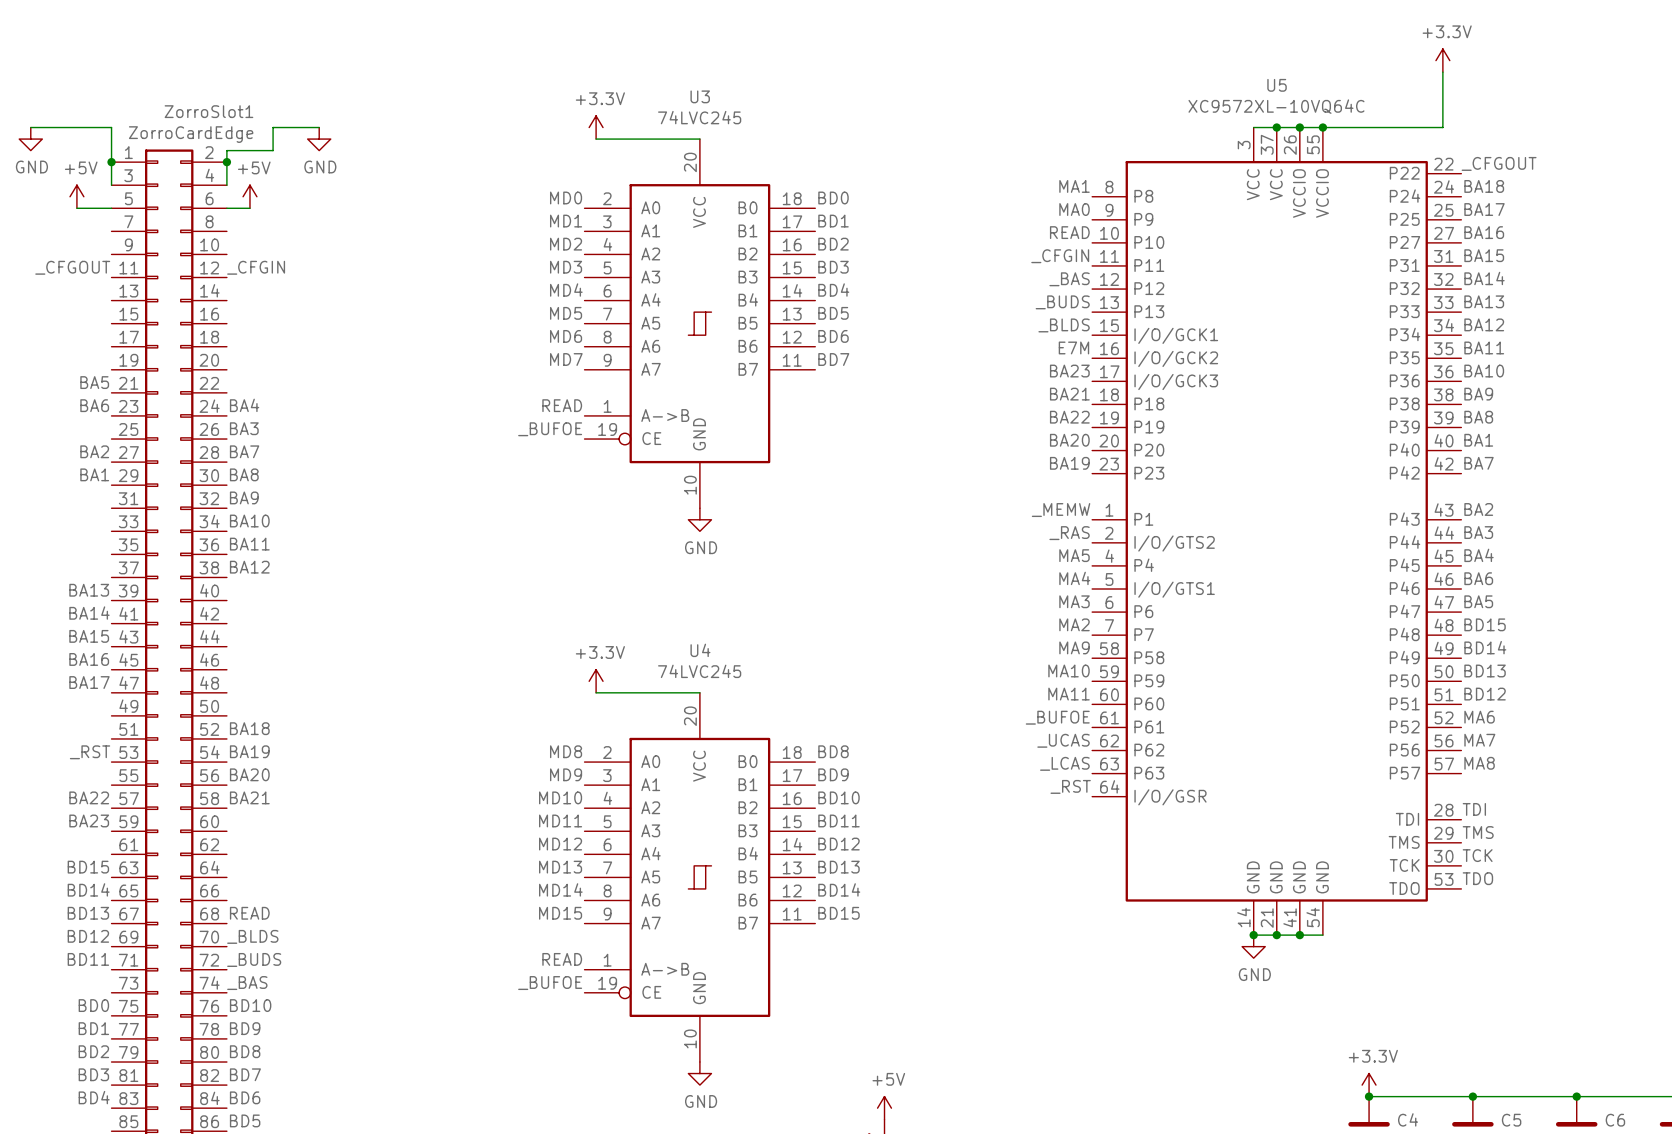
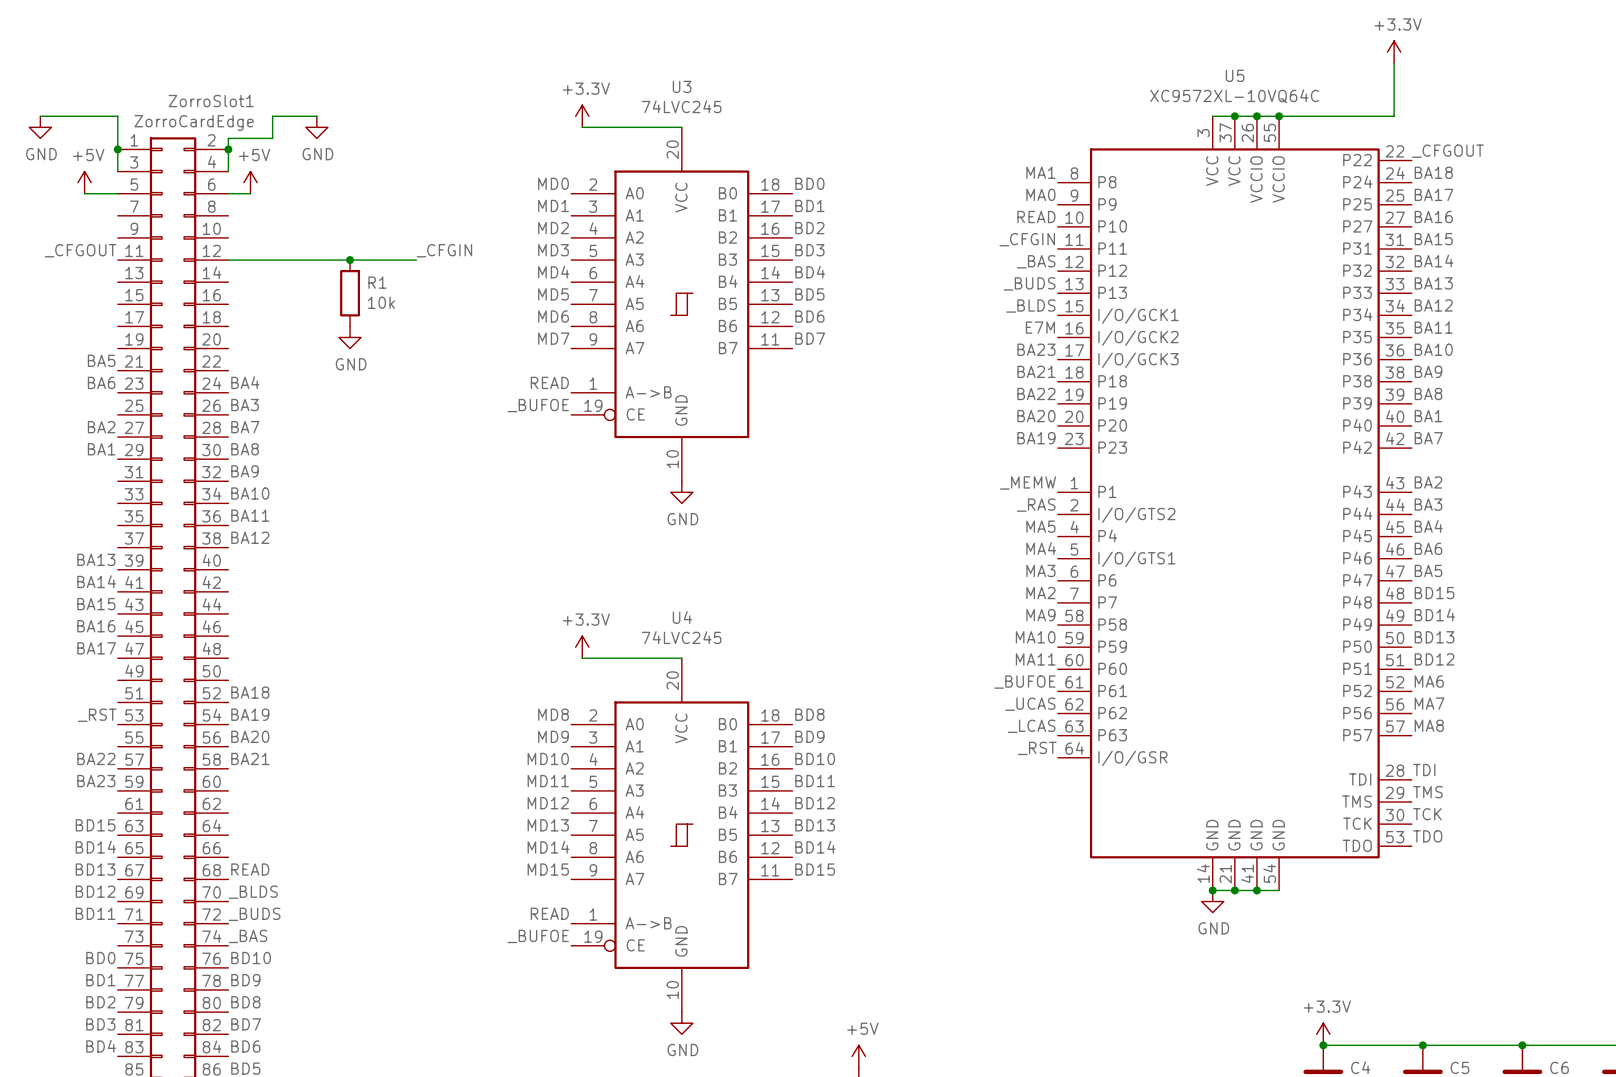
label position: _CFGIN (256, 267) -> _CFGIN (444, 250)
wire: none -> (228, 260) (416, 260)
junction: none -> (350, 260)
R1: none -> 10k (350, 293)
power symbol: none -> GND (350, 337)

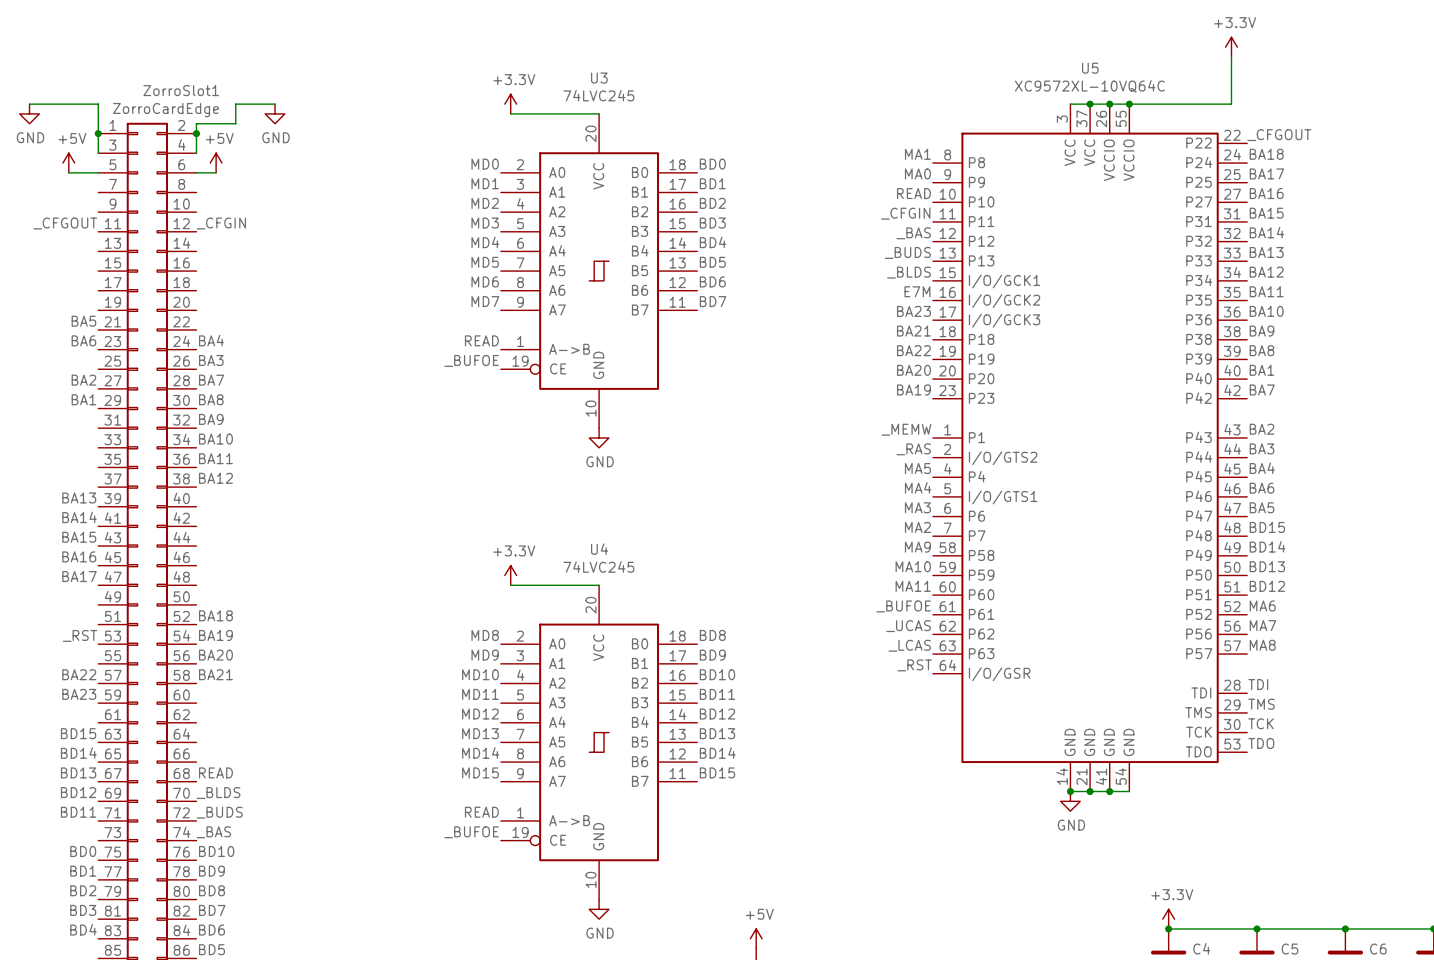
label position: _CFGIN (444, 250) -> _CFGIN (221, 223)
wire: (228, 260) (416, 260) -> none
junction: (350, 260) -> none
R1: 10k (350, 293) -> none
power symbol: GND (350, 337) -> none

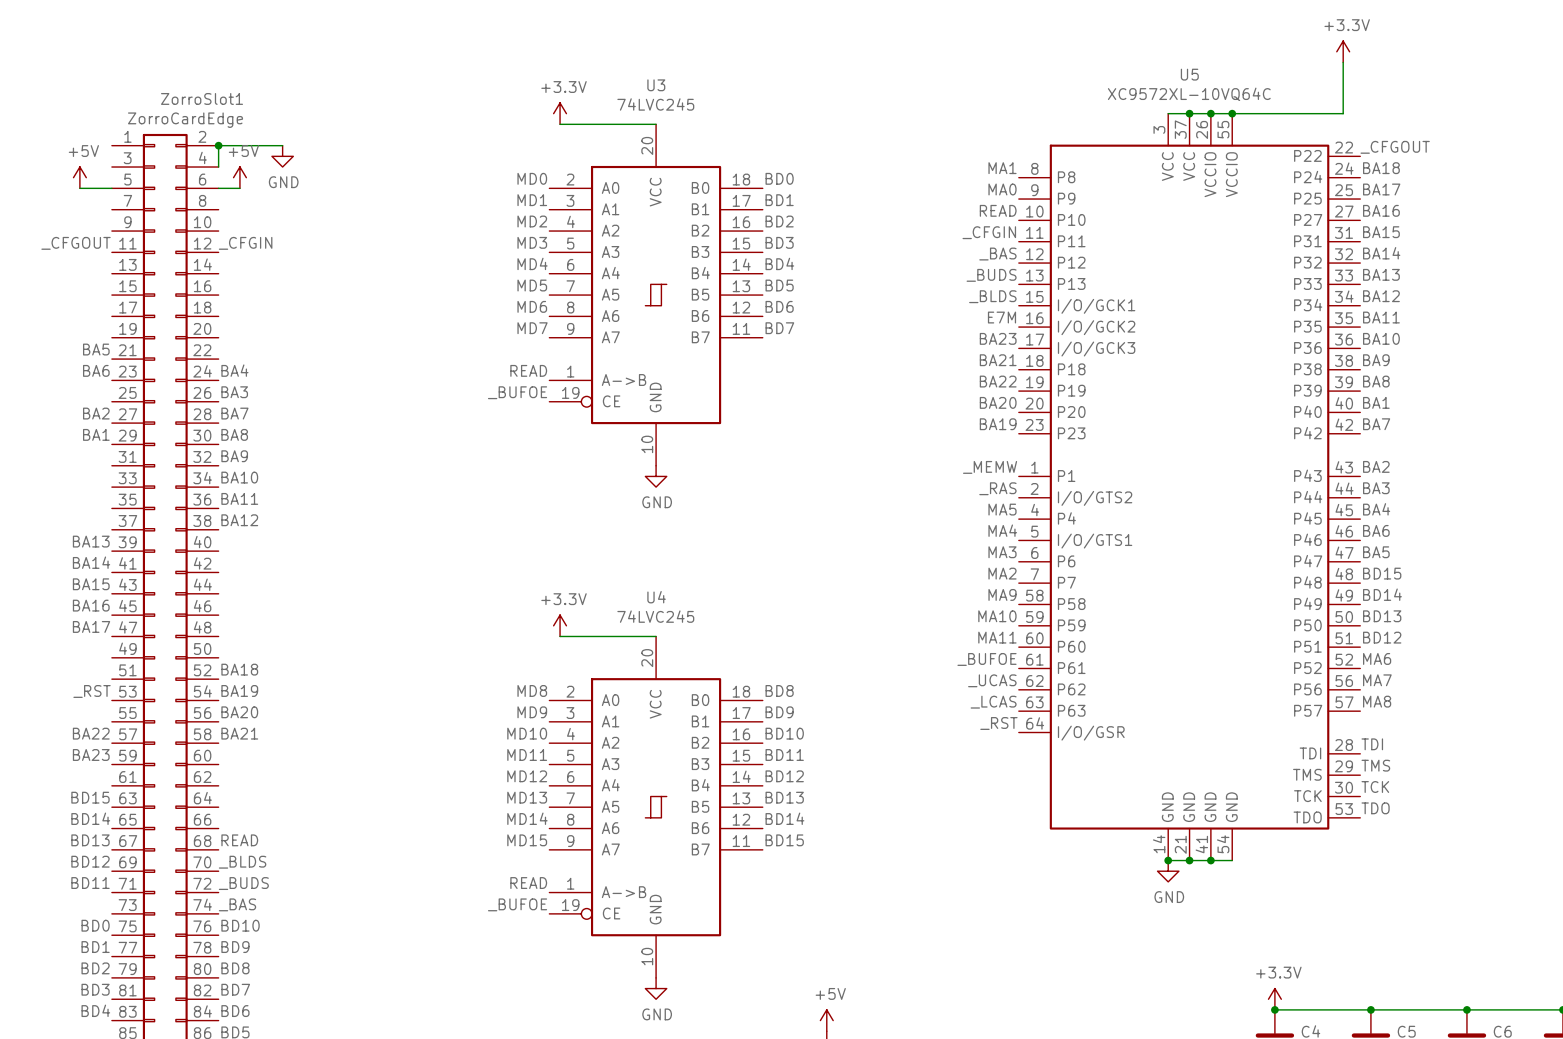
wire: (29, 104) (98, 104) (98, 153) -> none
wire: (275, 104) (235, 104) (235, 123) (196, 123) (196, 133) -> (282, 145) (218, 145)
power symbol: GND (29, 113) -> none
power symbol position: GND (275, 113) -> GND (282, 156)
junction: (98, 133) -> none

